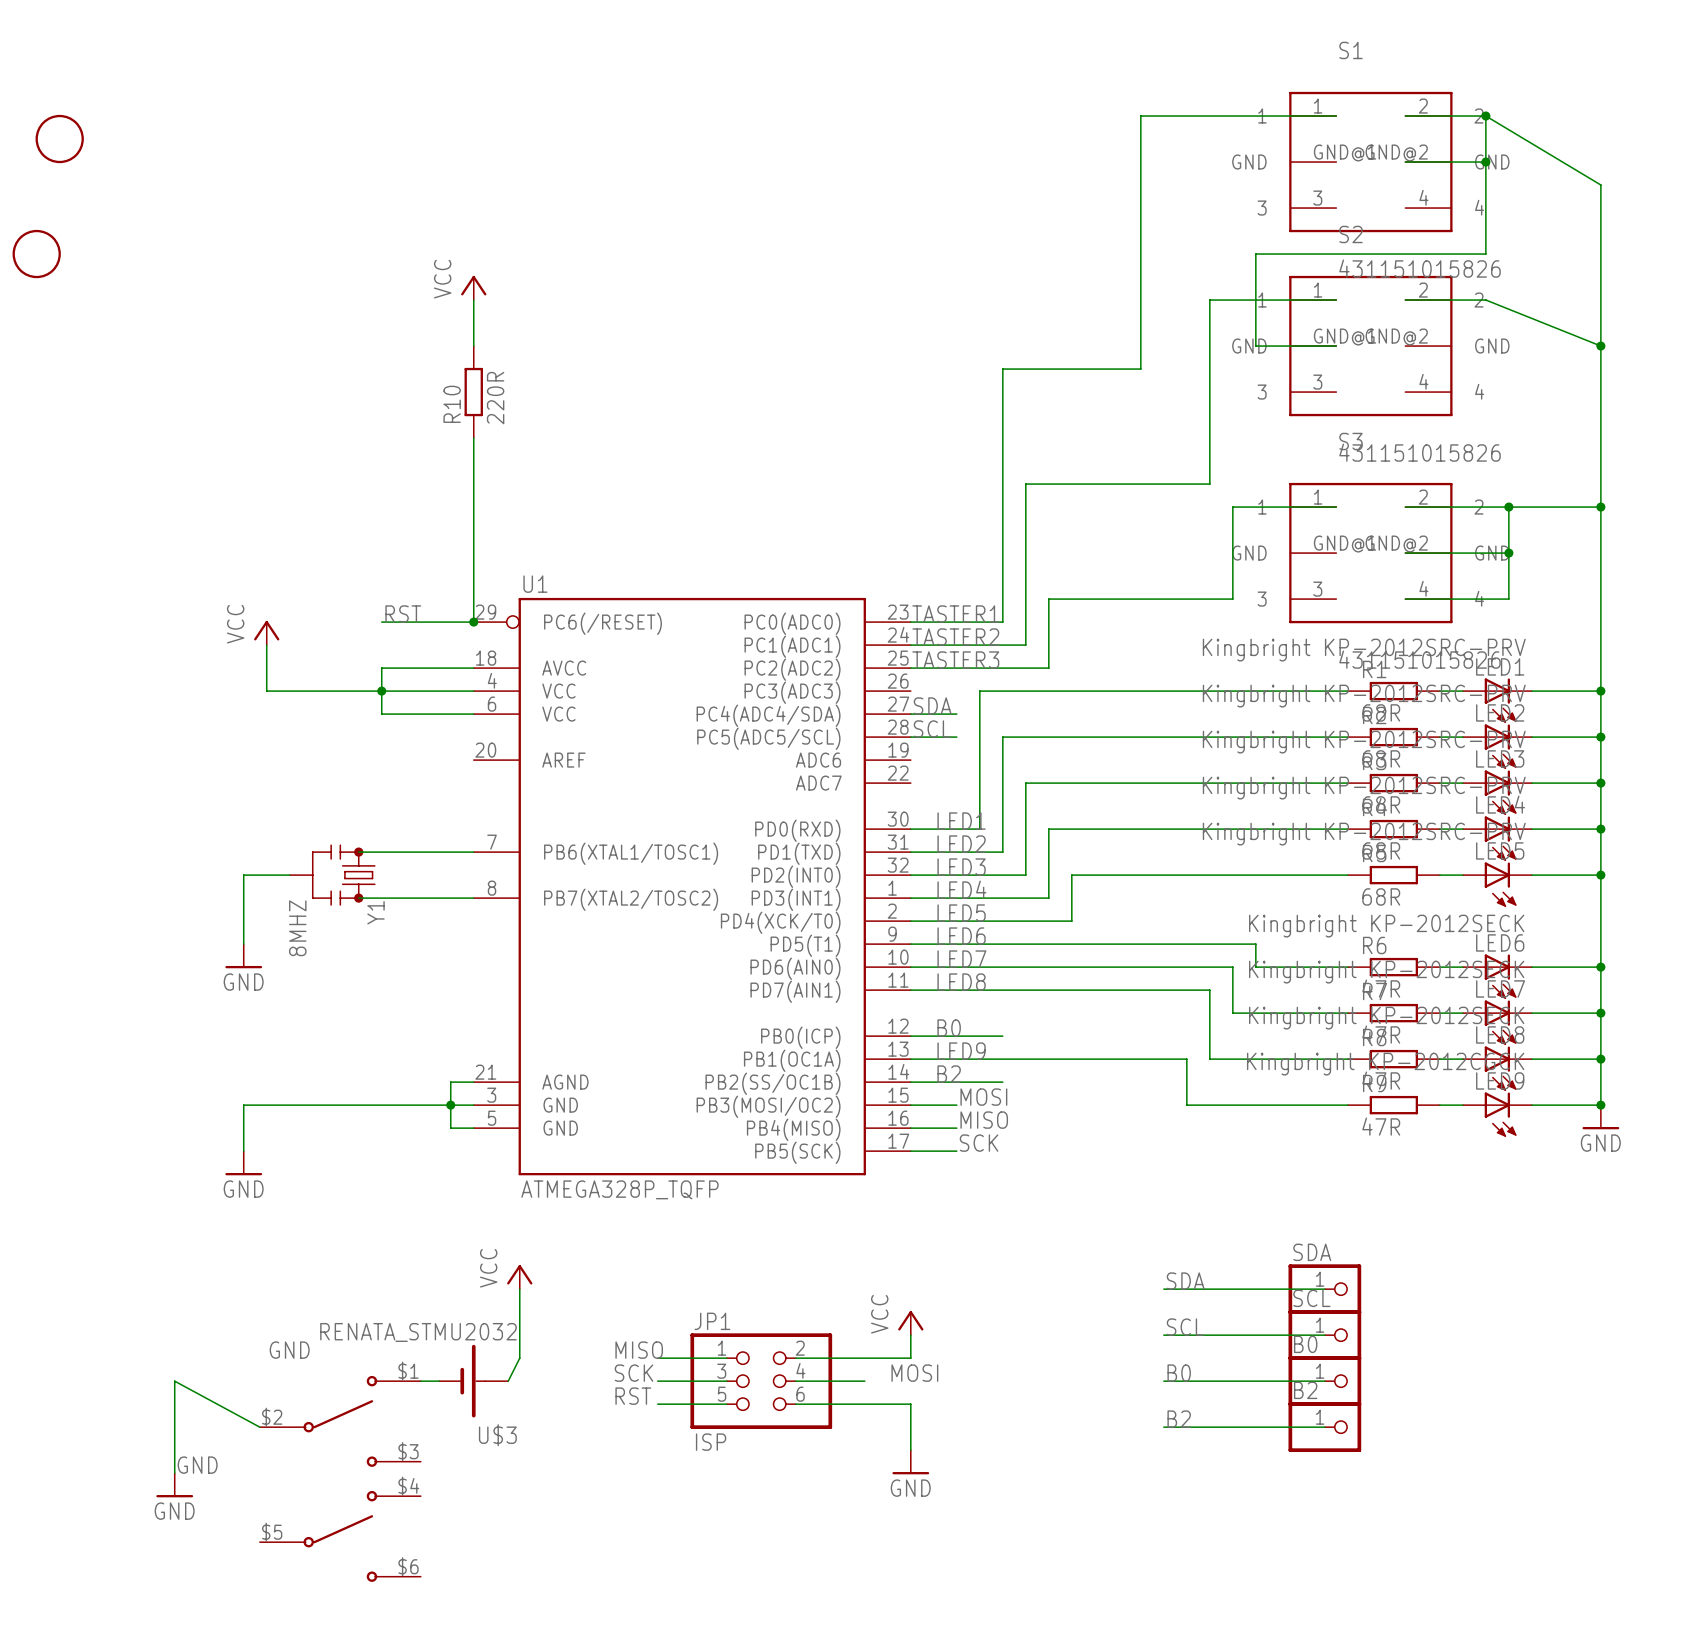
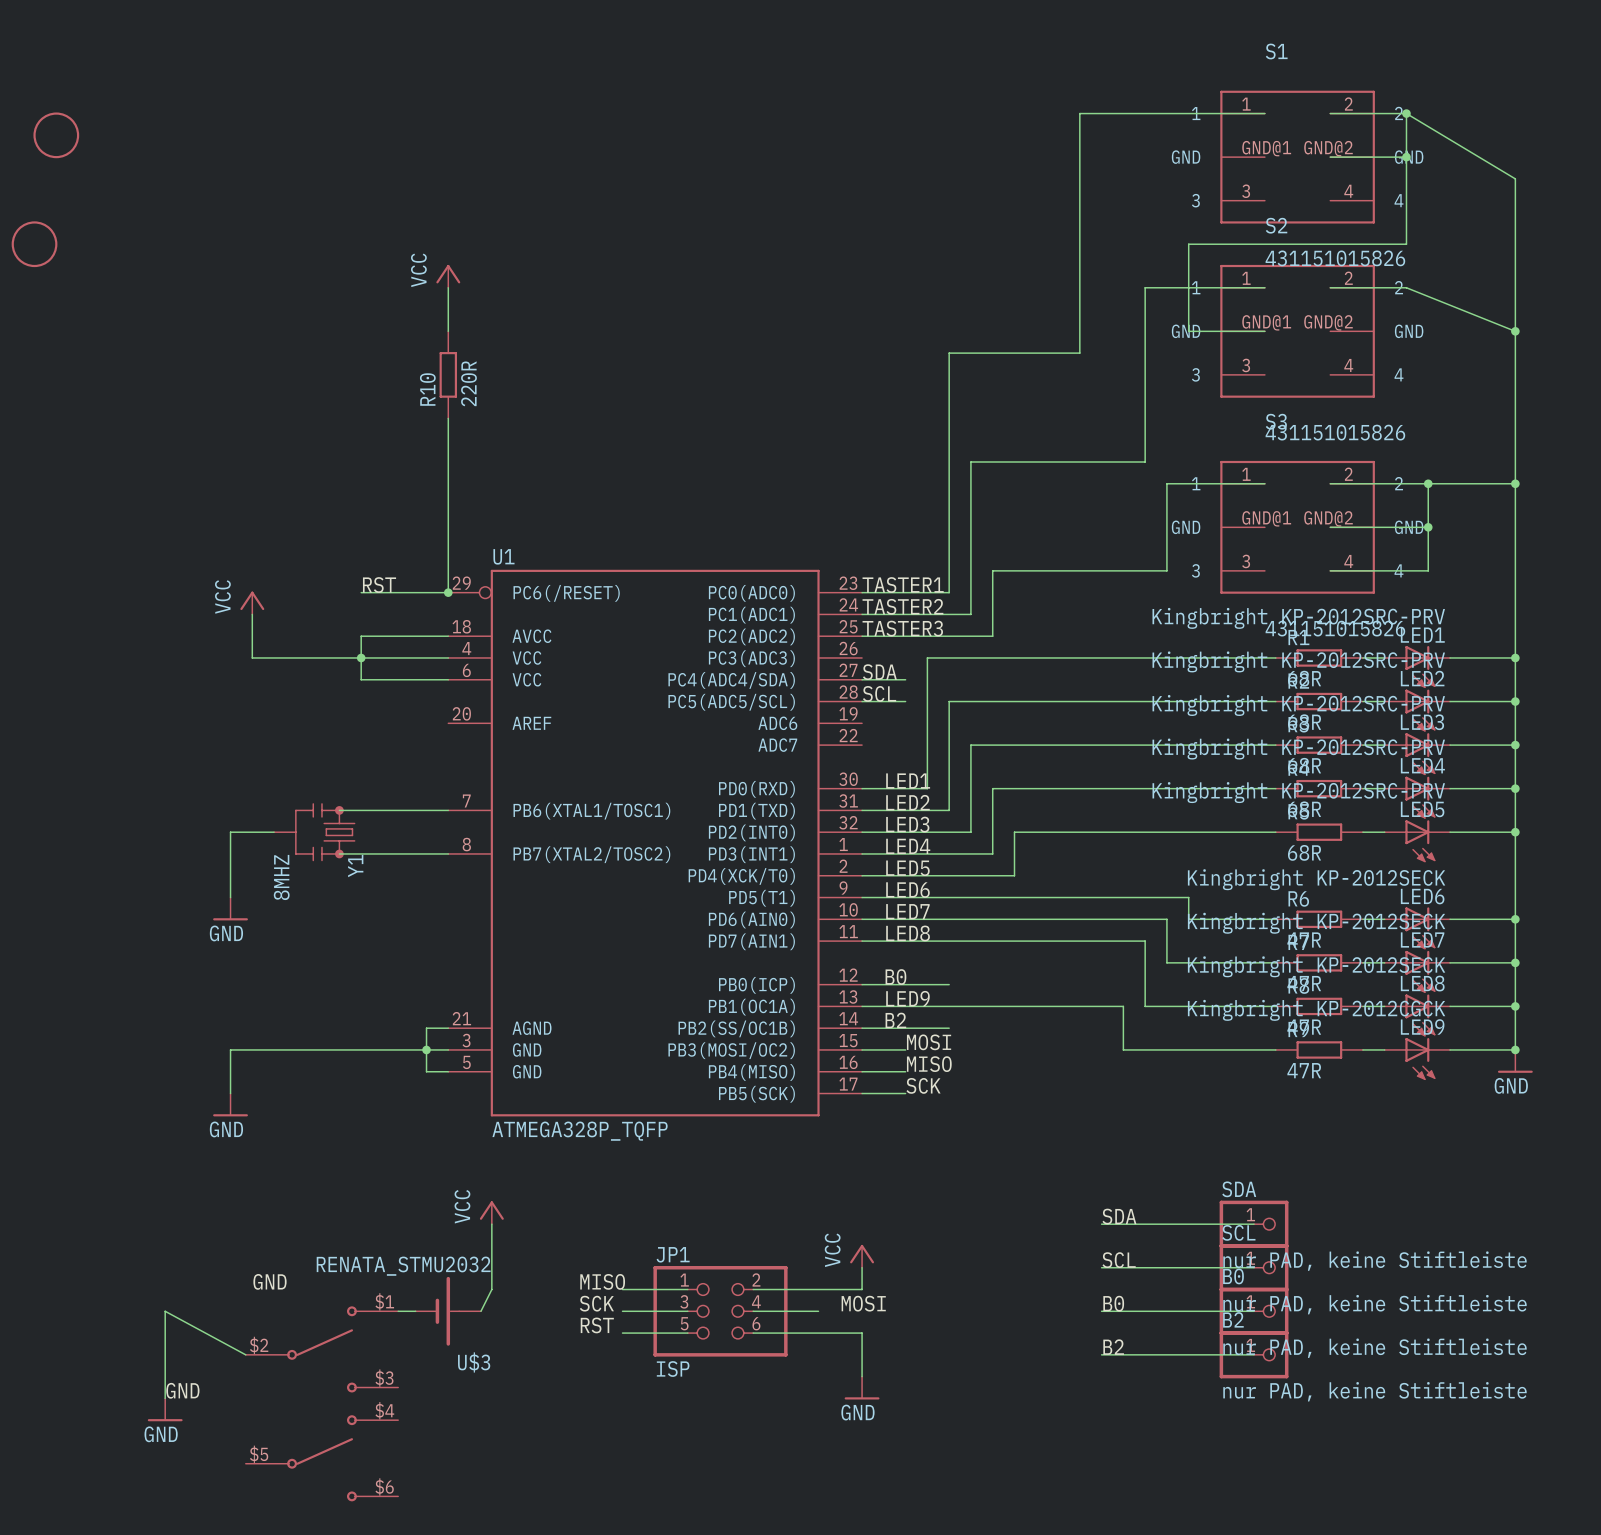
SDA value: none -> nur PAD, keine Stiftleiste (1375, 1261)
SCL value: none -> nur PAD, keine Stiftleiste (1375, 1304)
B0 value: none -> nur PAD, keine Stiftleiste (1375, 1348)
B2 value: none -> nur PAD, keine Stiftleiste (1375, 1391)

